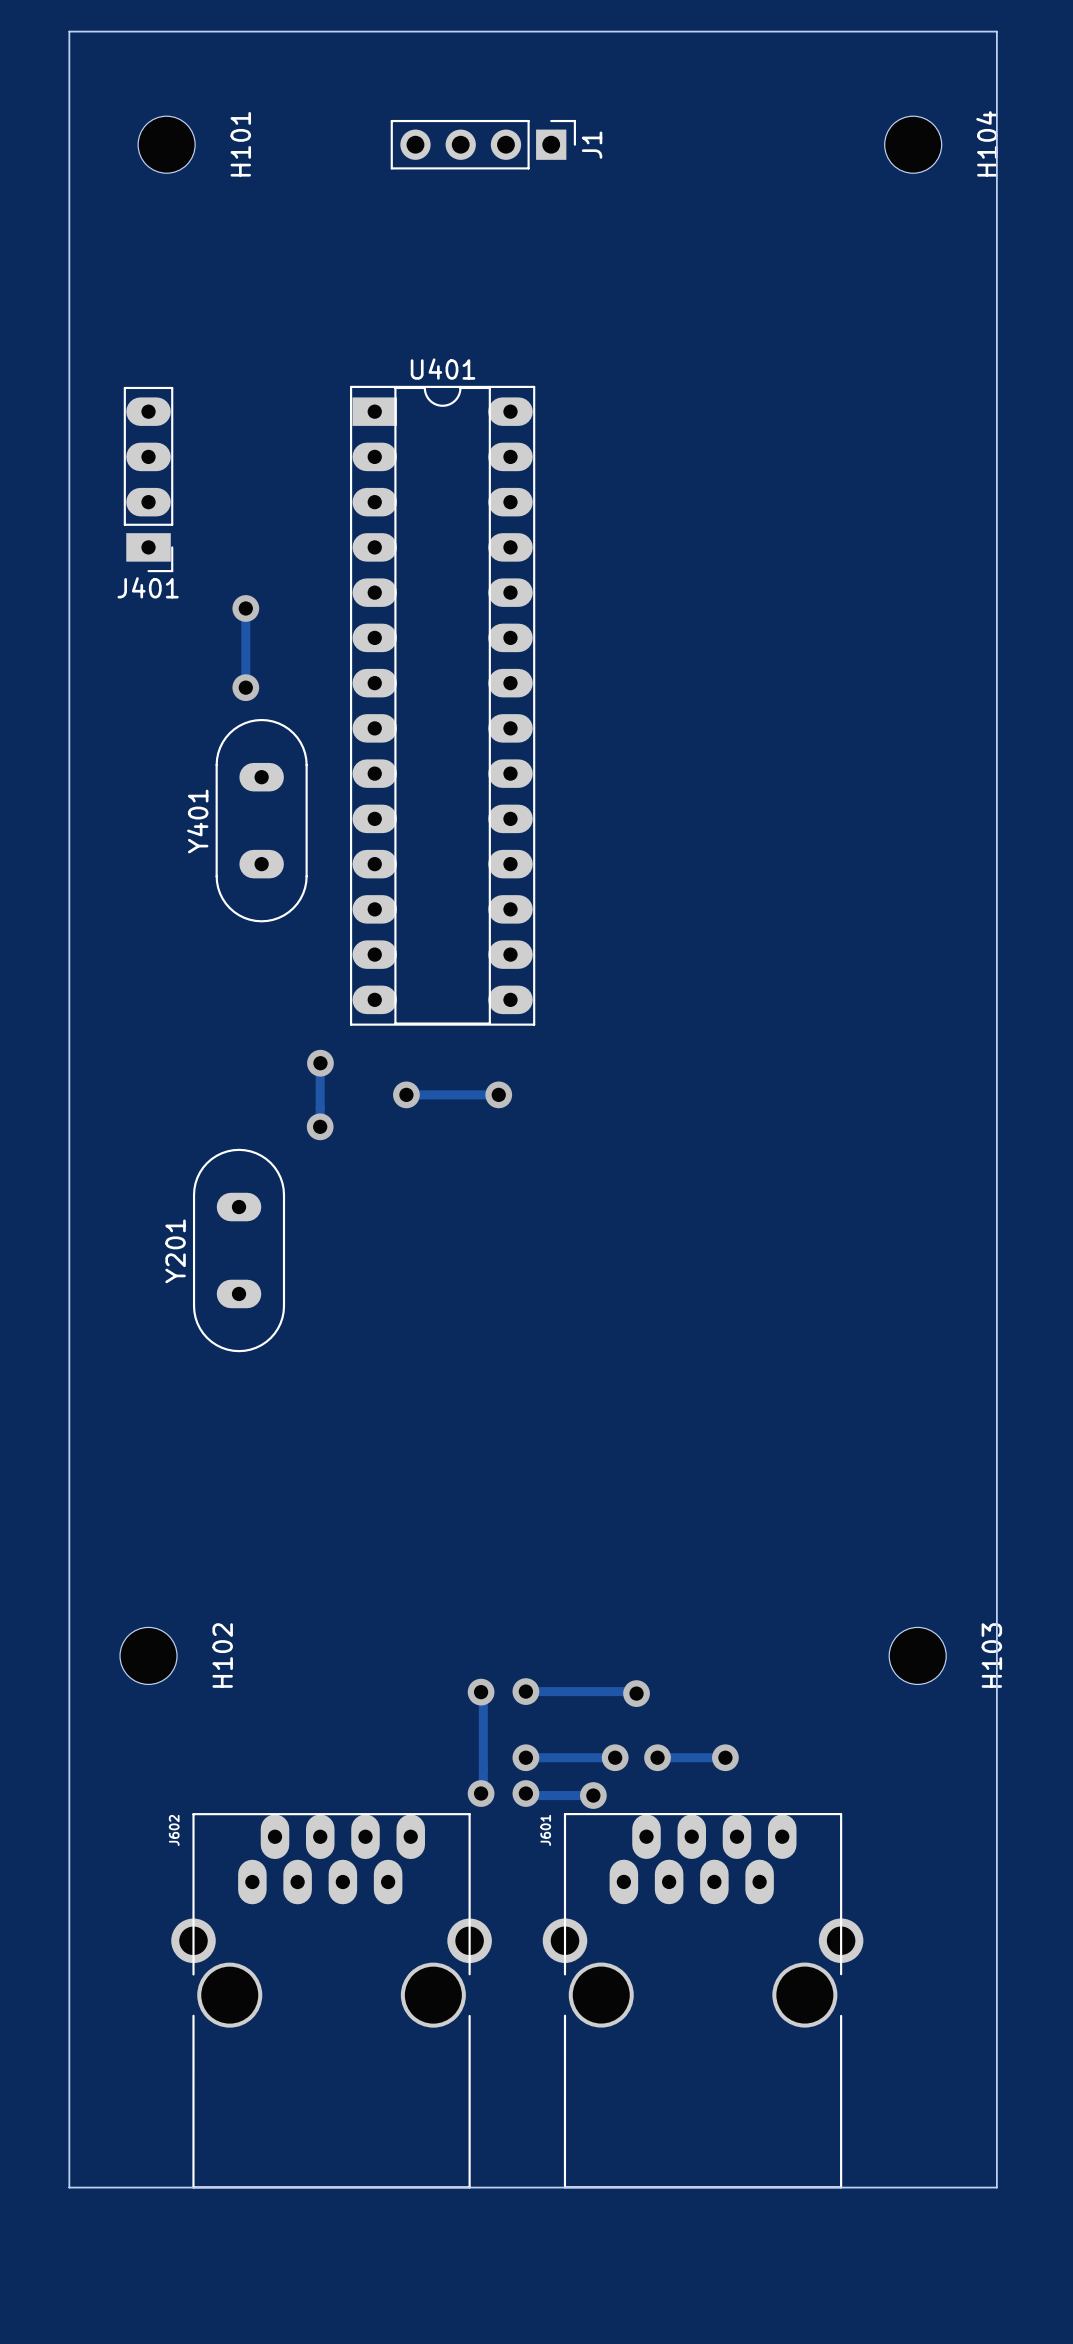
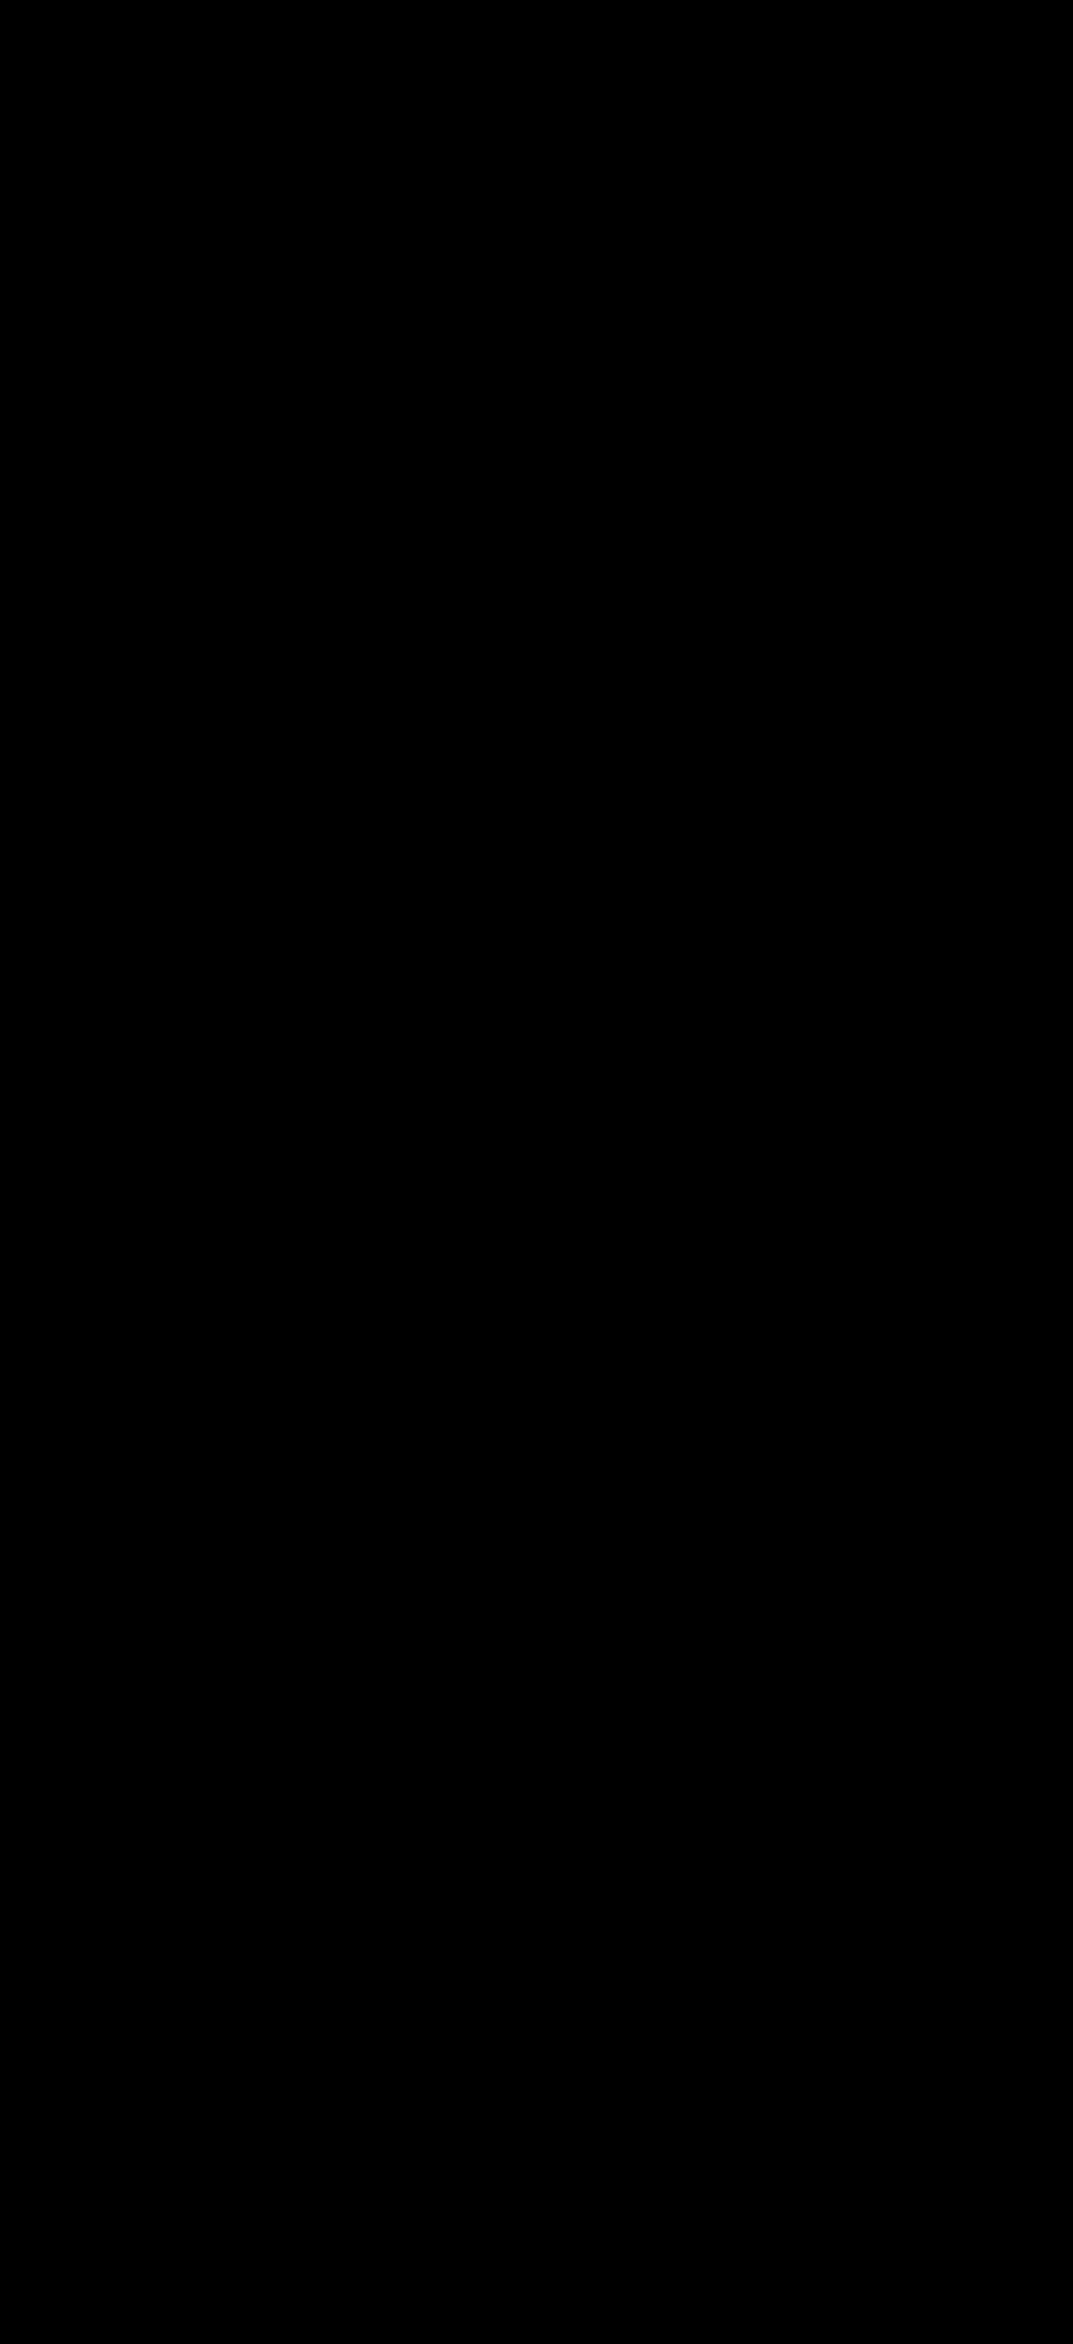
board edge: (69, 31) (996, 31) (996, 2187) (69, 2187) (69, 31) -> none
H101: (166, 144) -> none
J1: (483, 144) -> none
H104: (913, 144) -> none
J401: (148, 479) -> none
track: (245, 608) (245, 687) -> none
via: (245, 608) -> none
via: (245, 687) -> none
U401: (442, 705) -> none
Y401: (261, 820) -> none
track: (320, 1063) (320, 1126) -> none
via: (320, 1063) -> none
track: (406, 1094) (498, 1094) -> none
via: (406, 1094) -> none
via: (498, 1094) -> none
via: (320, 1126) -> none
Y201: (239, 1250) -> none
H102: (148, 1655) -> none
H103: (917, 1655) -> none
track: (481, 1687) (483, 1689) (483, 1787) -> none
track: (525, 1691) (634, 1691) (636, 1693) -> none
via: (525, 1691) -> none
via: (481, 1692) -> none
via: (636, 1693) -> none
track: (525, 1757) (615, 1757) -> none
via: (525, 1757) -> none
via: (615, 1757) -> none
track: (657, 1757) (725, 1757) -> none
via: (657, 1757) -> none
via: (725, 1757) -> none
via: (481, 1793) -> none
track: (525, 1793) (527, 1795) (593, 1795) -> none
via: (525, 1793) -> none
via: (593, 1795) -> none
J602: (331, 2000) -> none
J601: (703, 2000) -> none

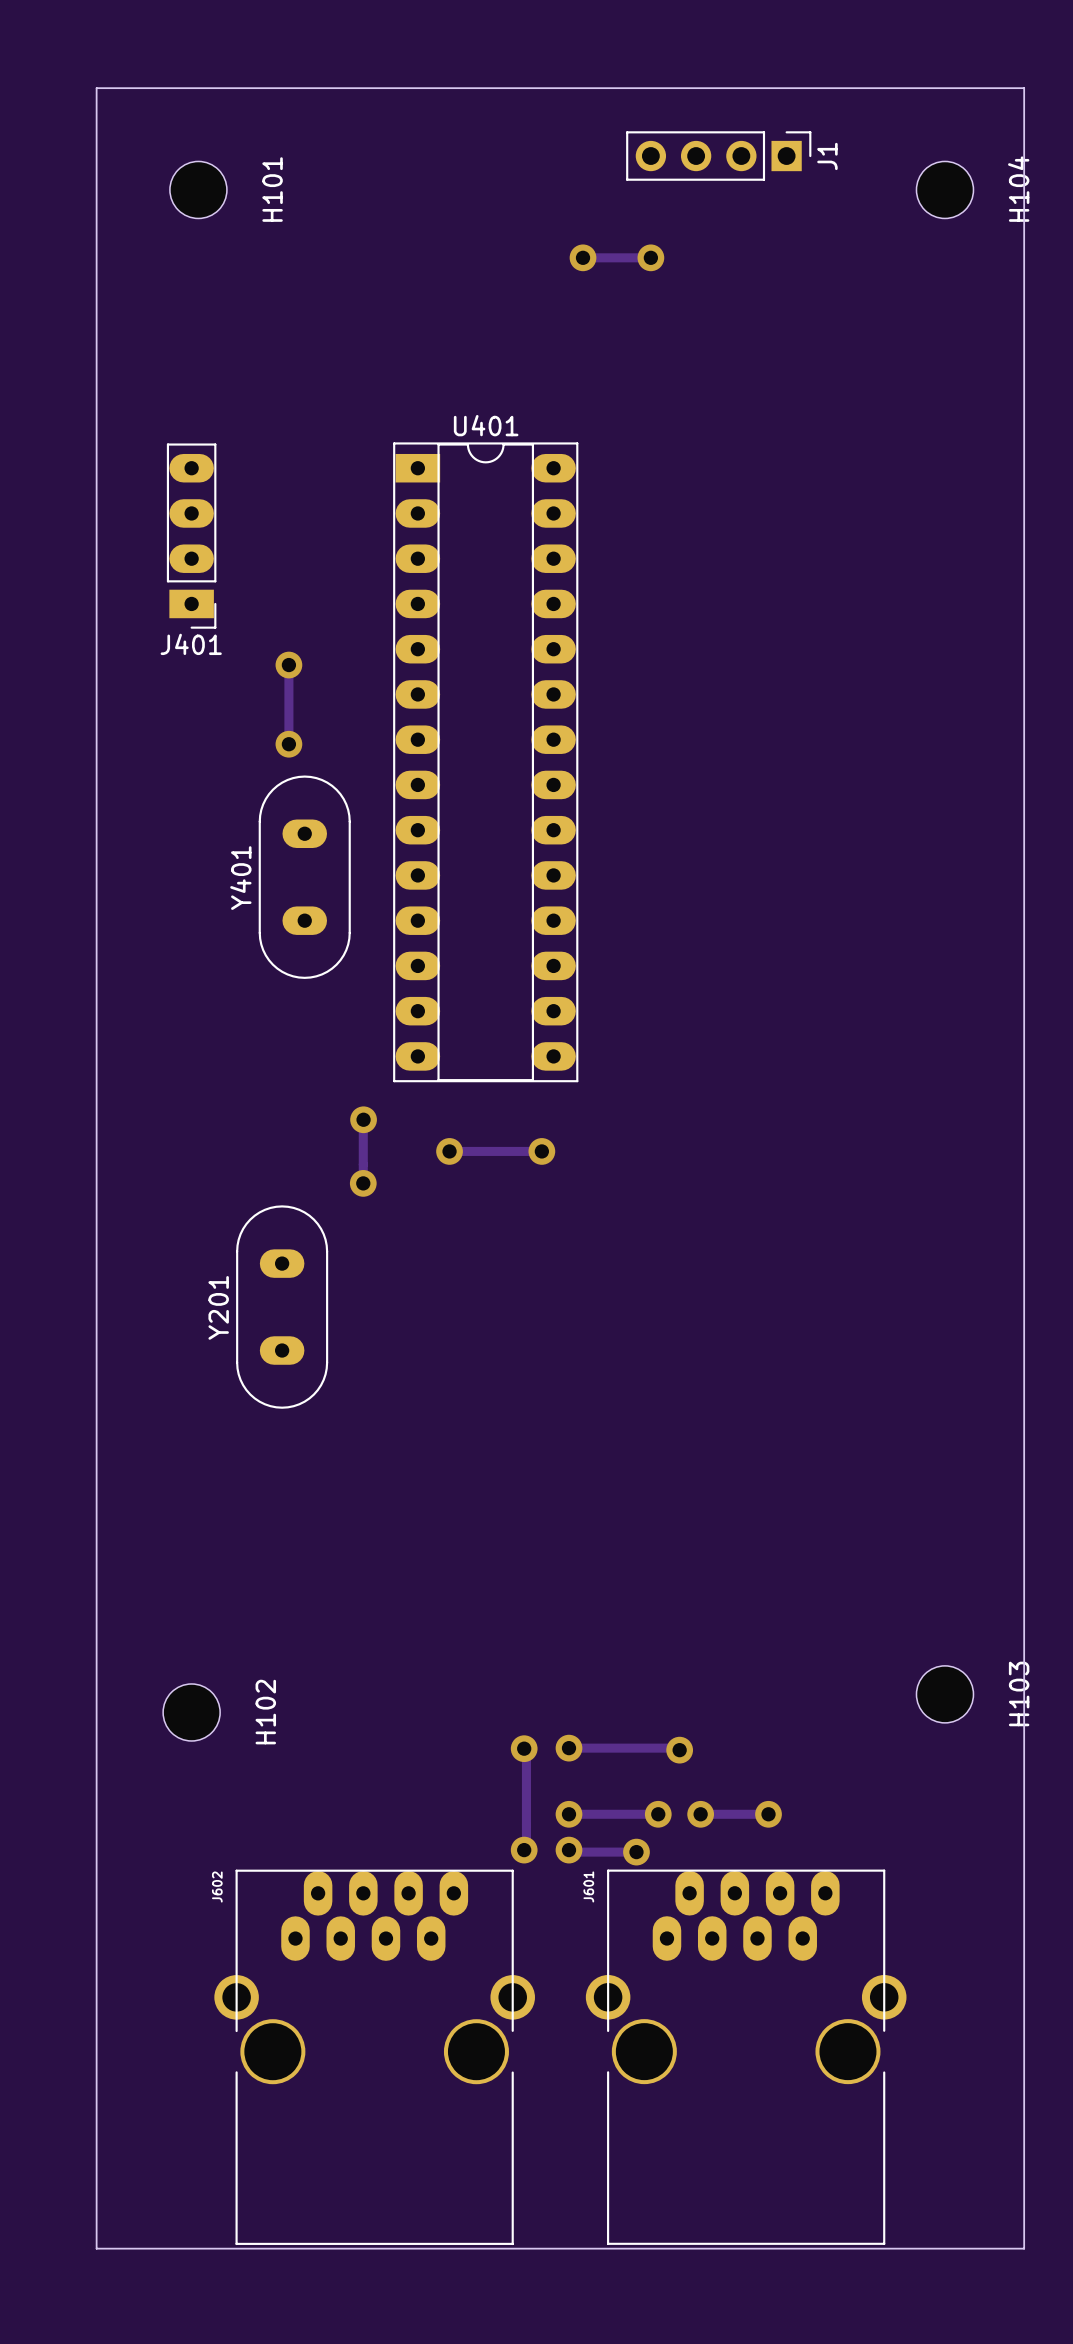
board edge: none -> (96, 88) (1024, 88) (1024, 2248) (96, 2248) (96, 88)
J1: none -> (718, 156)
H101: none -> (198, 189)
H104: none -> (944, 189)
track: none -> (583, 257) (650, 257)
via: none -> (583, 257)
via: none -> (650, 257)
J401: none -> (191, 536)
track: none -> (288, 665) (288, 744)
via: none -> (288, 665)
via: none -> (288, 744)
U401: none -> (485, 762)
Y401: none -> (304, 877)
track: none -> (363, 1119) (363, 1183)
via: none -> (363, 1119)
track: none -> (449, 1151) (541, 1151)
via: none -> (449, 1151)
via: none -> (541, 1151)
via: none -> (363, 1183)
Y201: none -> (282, 1307)
H103: none -> (944, 1694)
H102: none -> (191, 1712)
track: none -> (524, 1744) (526, 1746) (526, 1843)
via: none -> (524, 1748)
track: none -> (568, 1748) (677, 1748) (679, 1750)
via: none -> (568, 1748)
via: none -> (679, 1750)
via: none -> (568, 1814)
track: none -> (569, 1814) (658, 1814)
via: none -> (658, 1814)
track: none -> (700, 1814) (768, 1814)
via: none -> (700, 1814)
via: none -> (768, 1814)
via: none -> (524, 1850)
track: none -> (568, 1850) (571, 1852) (636, 1852)
via: none -> (568, 1850)
via: none -> (636, 1852)
J602: none -> (374, 2057)
J601: none -> (746, 2057)

